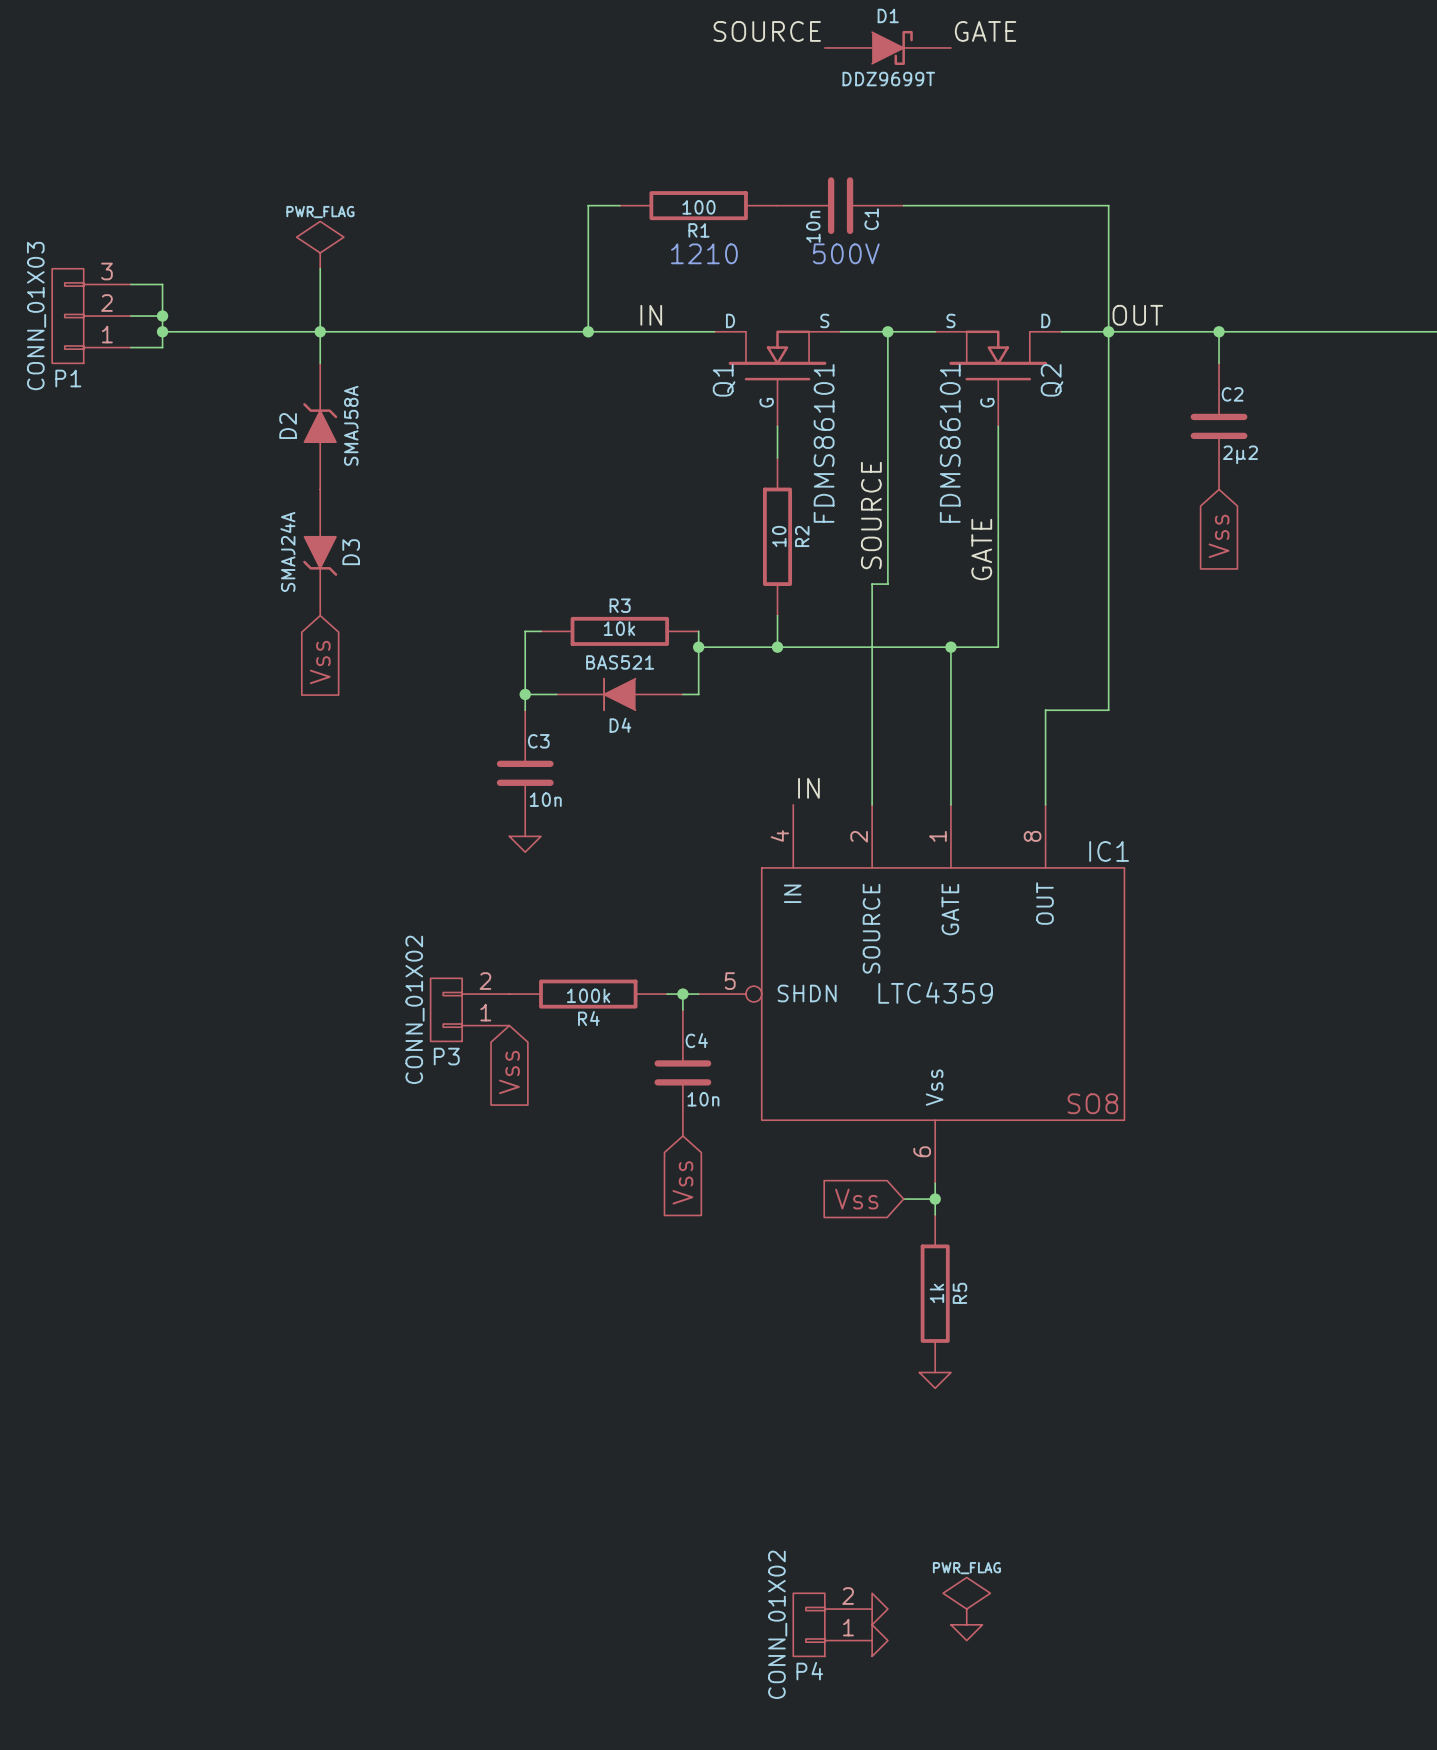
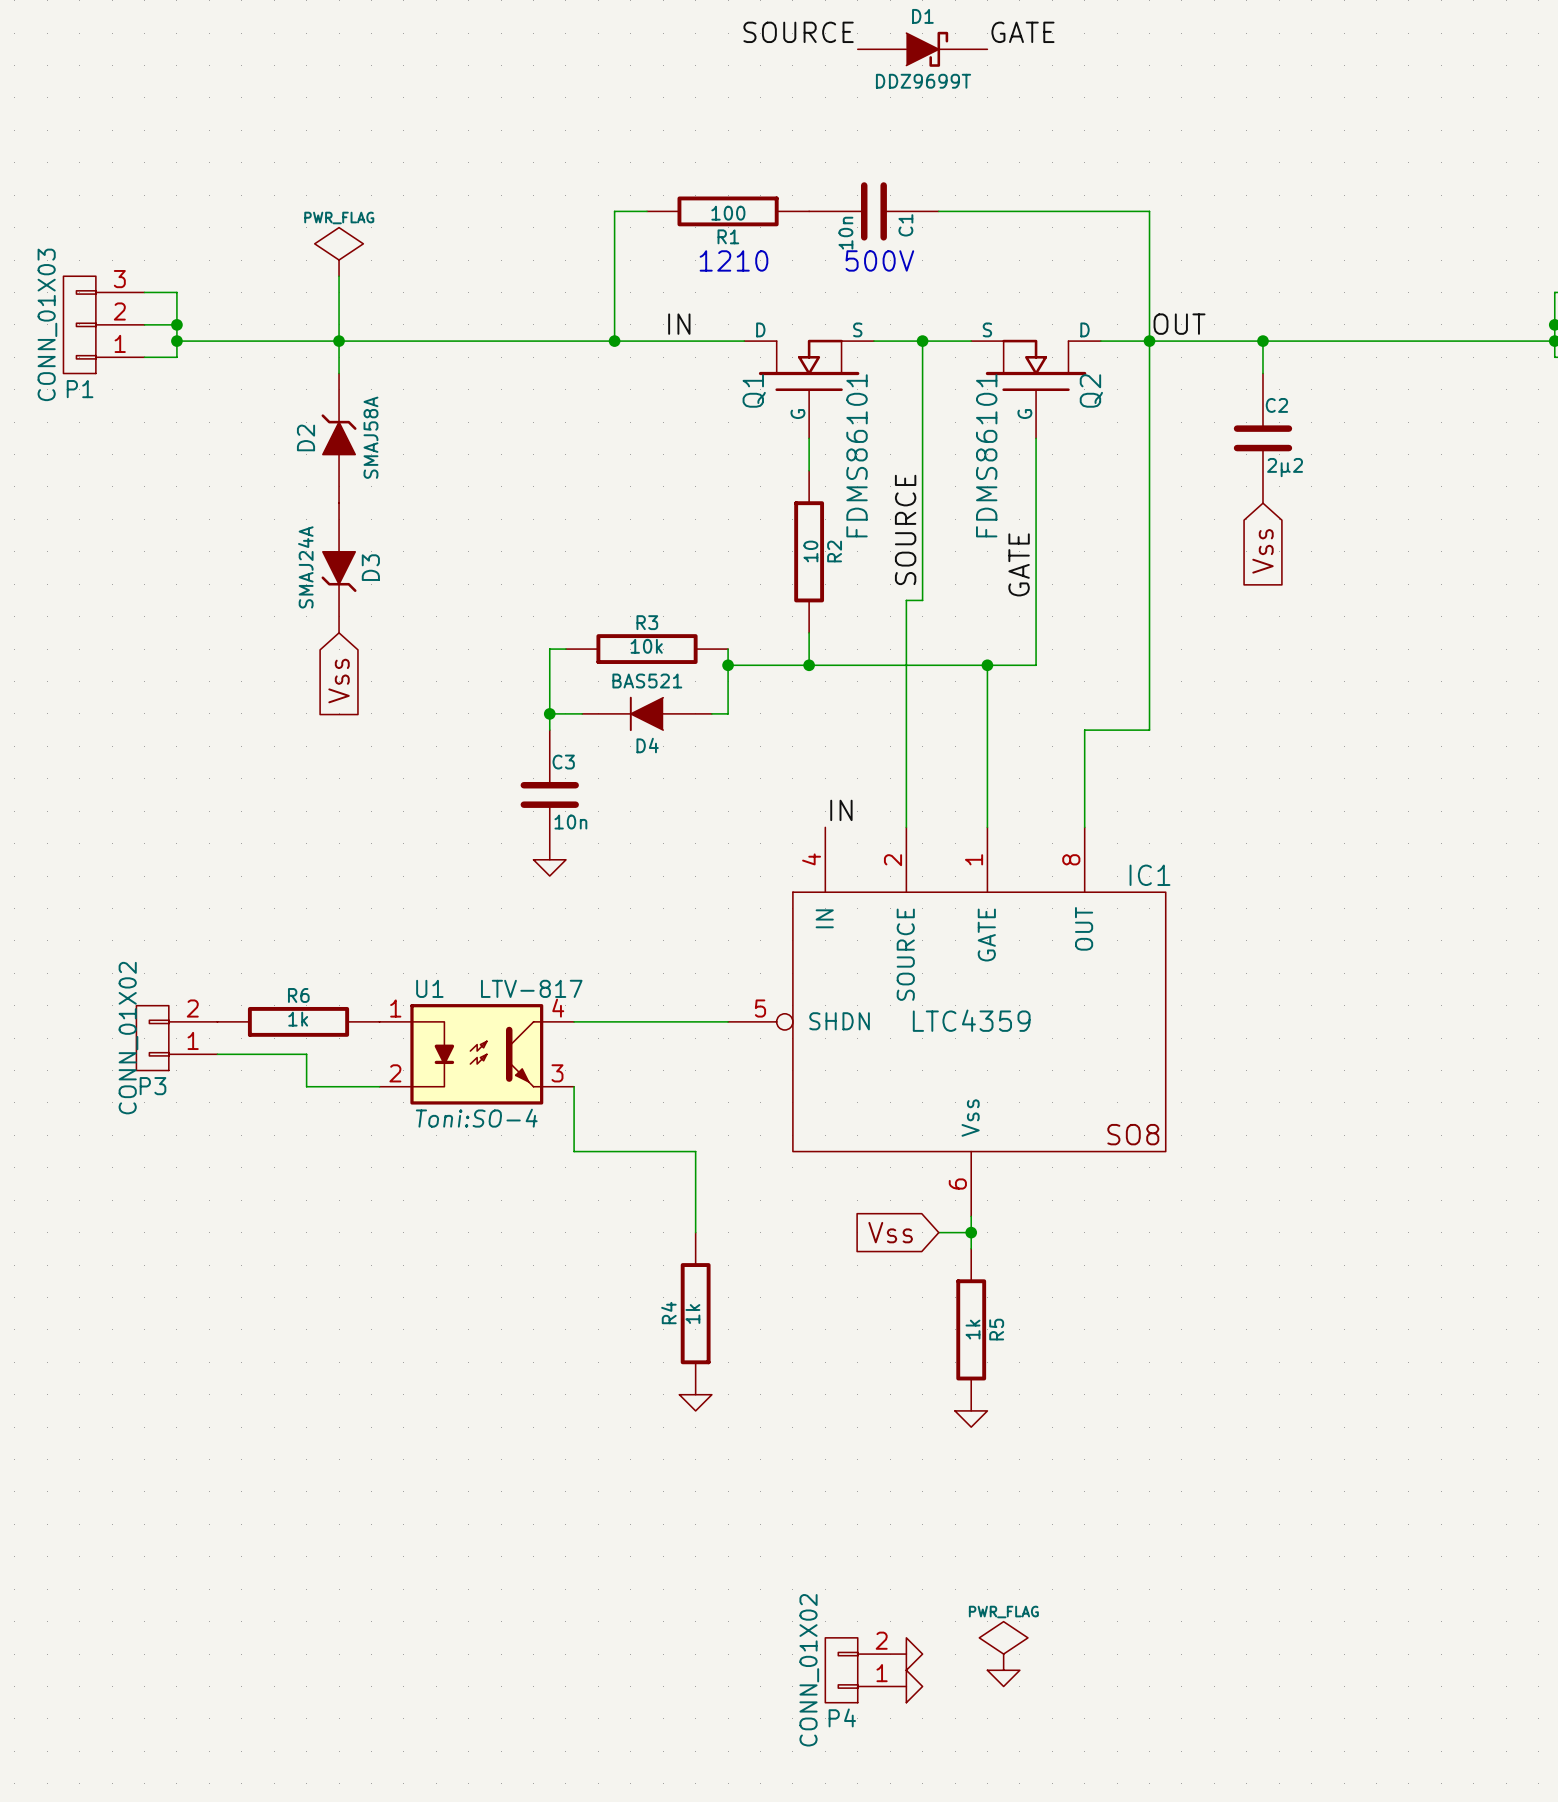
R6: none -> 1k (298, 1021)
wire: none -> (574, 1021) (695, 1021)
R4 rotation: 0° (588, 994) -> 90° clockwise (695, 1313)
R4 position: (588, 994) -> (695, 1313)
wire: (682, 994) (682, 1009) -> none
junction: (682, 994) -> none
R4 value: 100k (588, 995) -> 1k (692, 1313)
P3 value position: CONN_01X02 (414, 1009) -> CONN_01X02 (128, 1038)
P3 position: (470, 1009) -> (176, 1038)
wire: none -> (217, 1054) (306, 1054) (306, 1086) (379, 1086)
U1: none -> LTV-817 (476, 1054)
wire: none -> (574, 1086) (574, 1151) (695, 1151) (695, 1232)
global label: Vss (509, 1072) -> none
C4: 10n (682, 1072) -> none
global label: Vss (682, 1182) -> none
power symbol: none -> (695, 1402)

